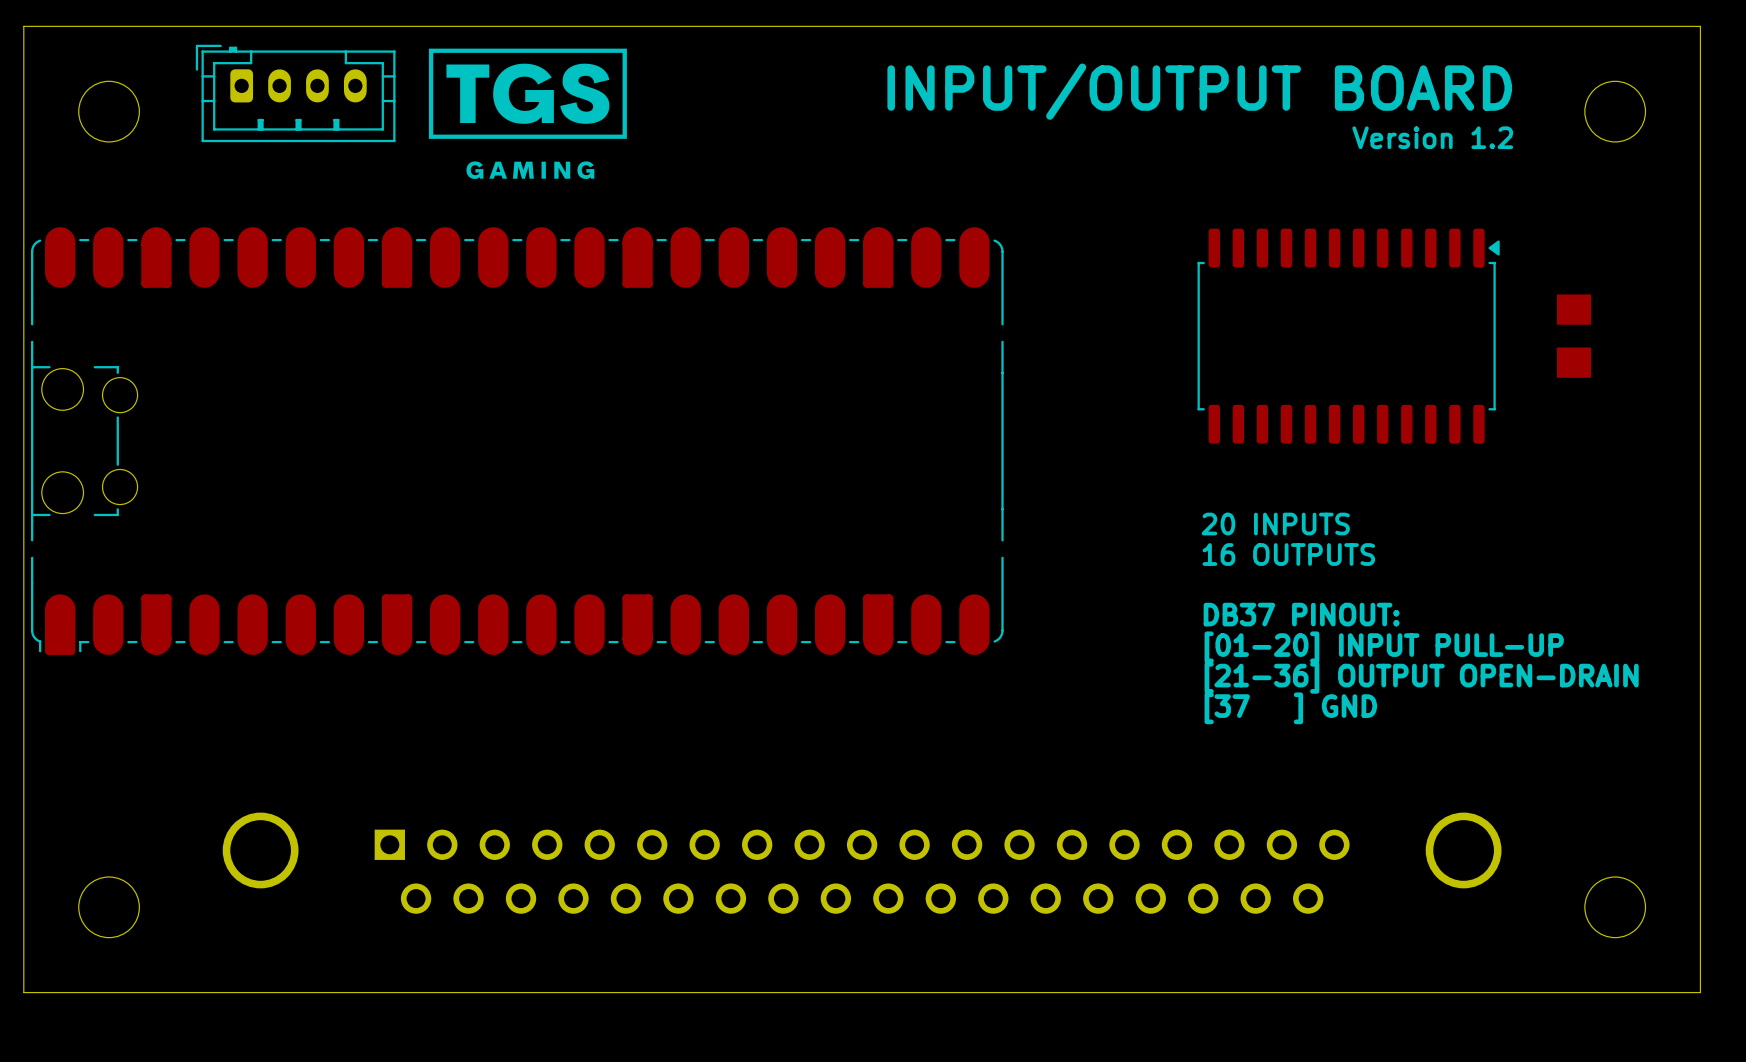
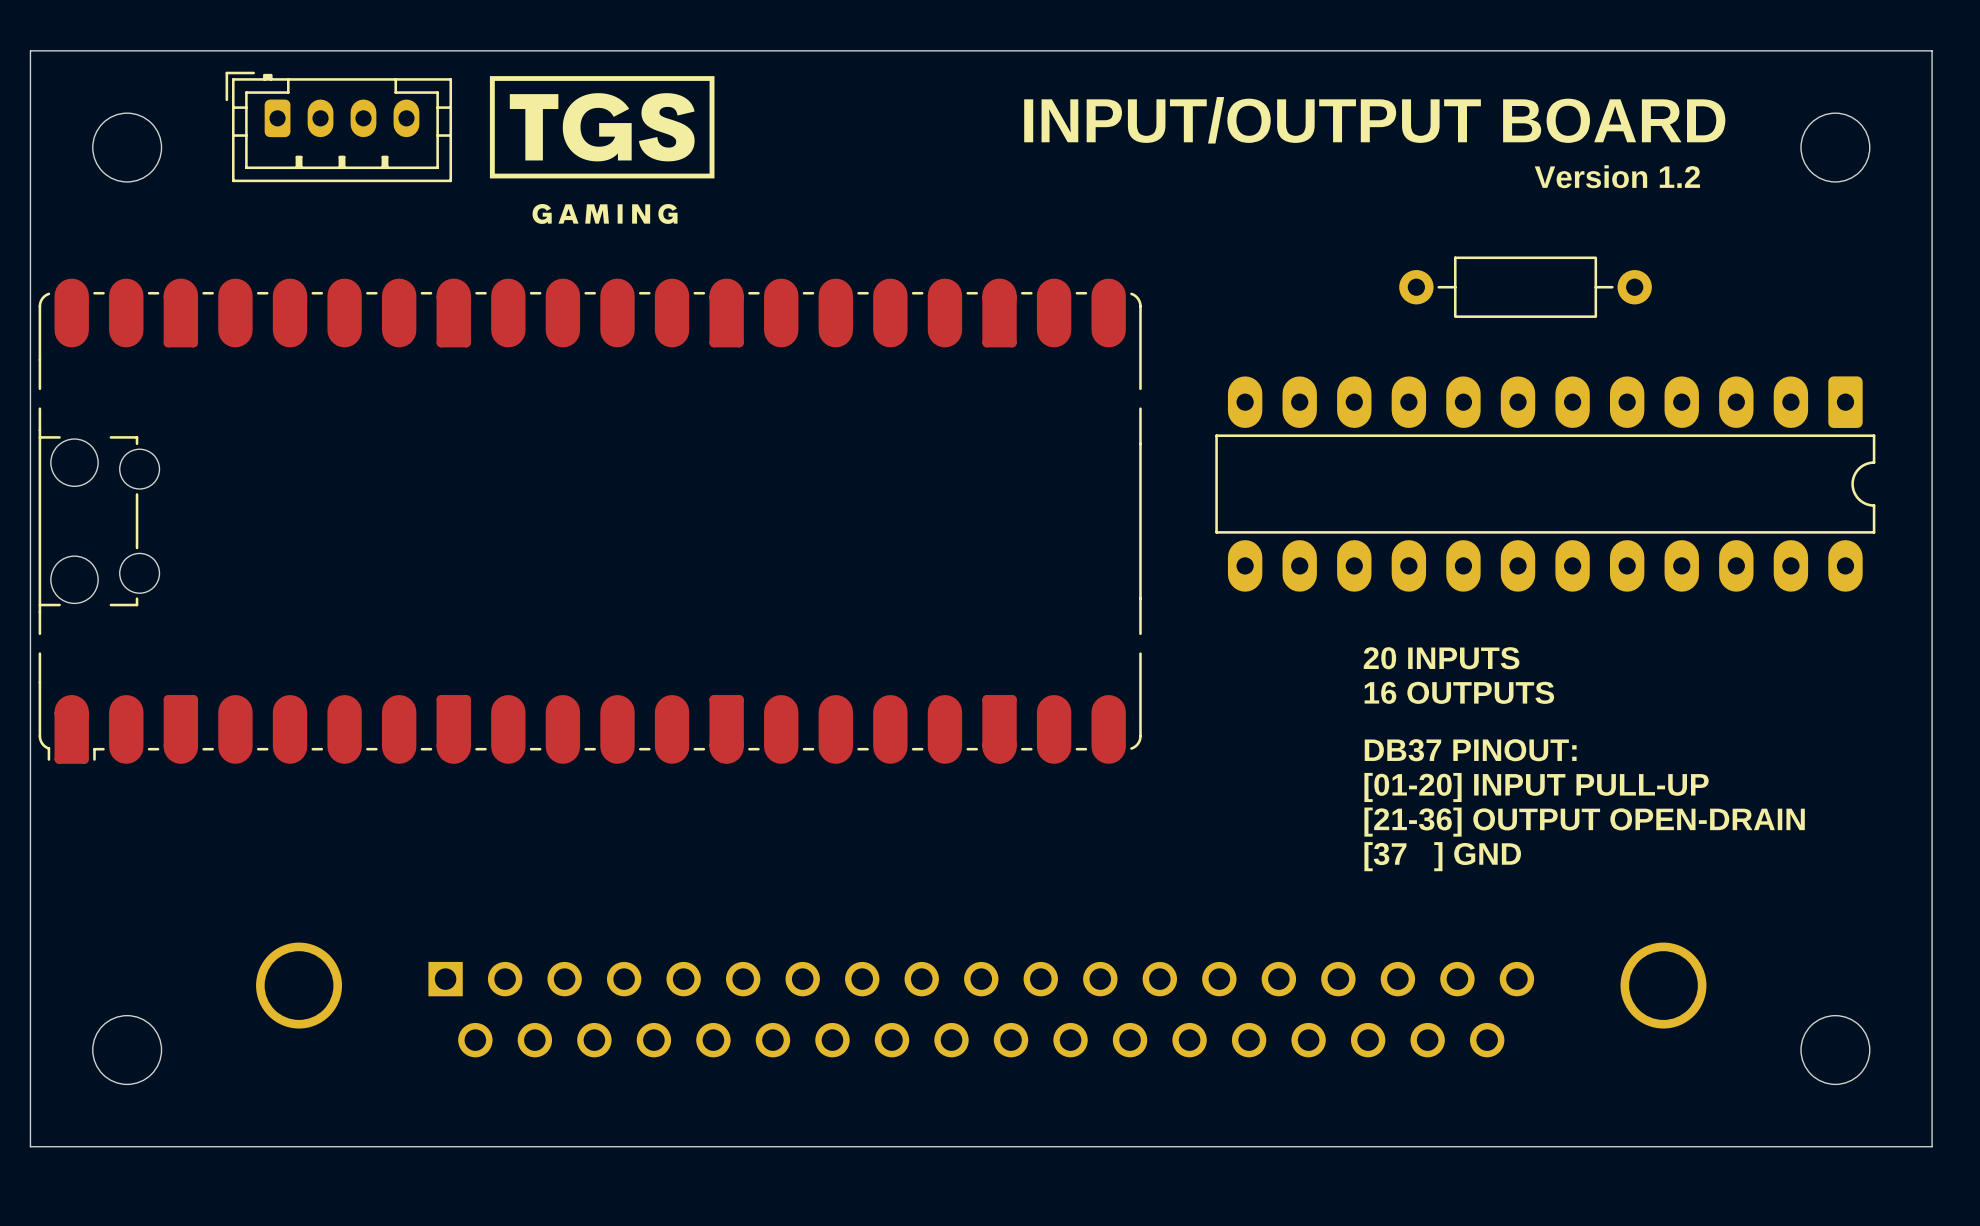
part: none -> (1525, 287)
part: (1348, 336) -> none
part: (1573, 336) -> none
part: none -> (1545, 484)
text: 20 INPUTS (1275, 524) -> none
text: 16 OUTPUTS (1288, 554) -> 20 INPUTS (1441, 658)
text: none -> 16 OUTPUTS (1459, 692)
text: DB37 PINOUT: (1301, 614) -> none
text: [01-20] INPUT PULL-UP (1384, 647) -> DB37 PINOUT: (1470, 750)
text: [21-36] OUTPUT OPEN-DRAIN (1421, 677) -> [01-20] INPUT PULL-UP (1536, 787)
text: [37 ] GND (1290, 708) -> [21-36] OUTPUT OPEN-DRAIN (1584, 822)
text: none -> [37 ] GND (1442, 856)

